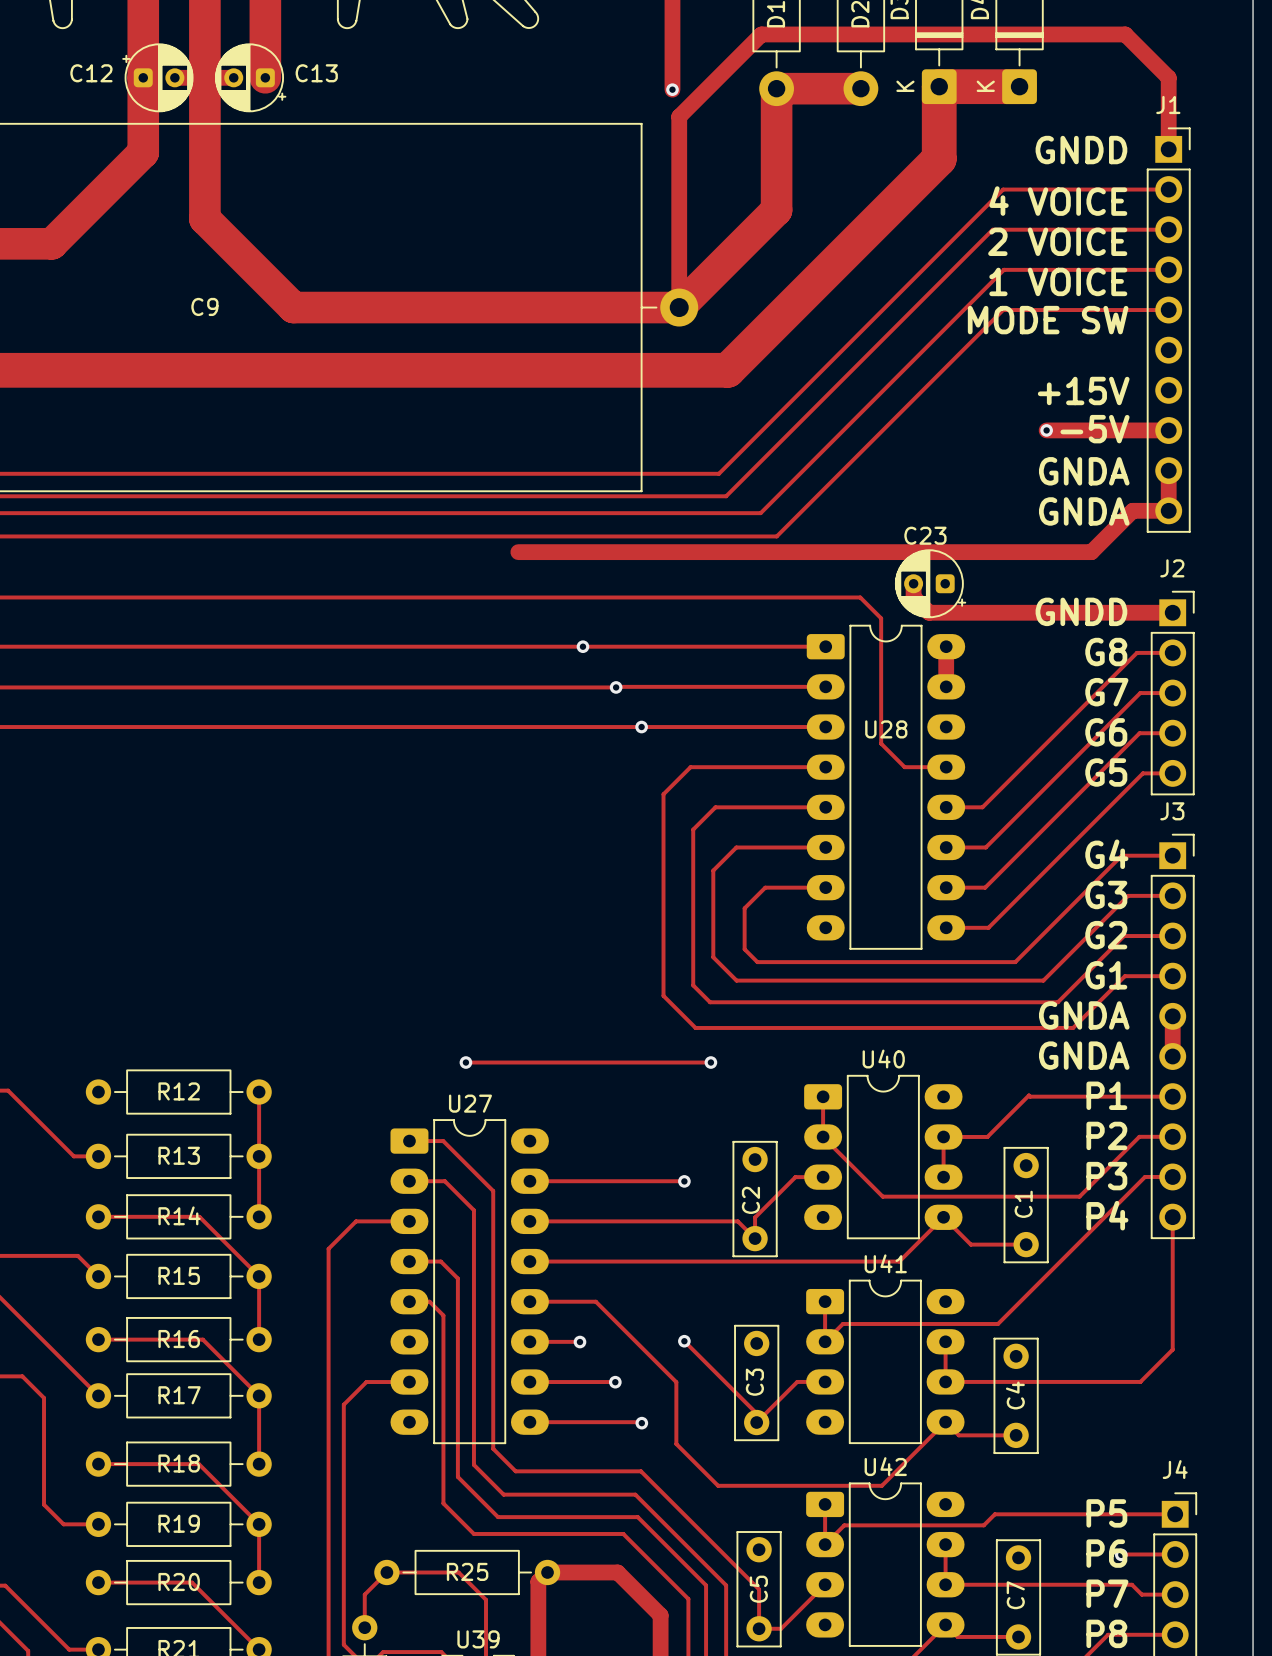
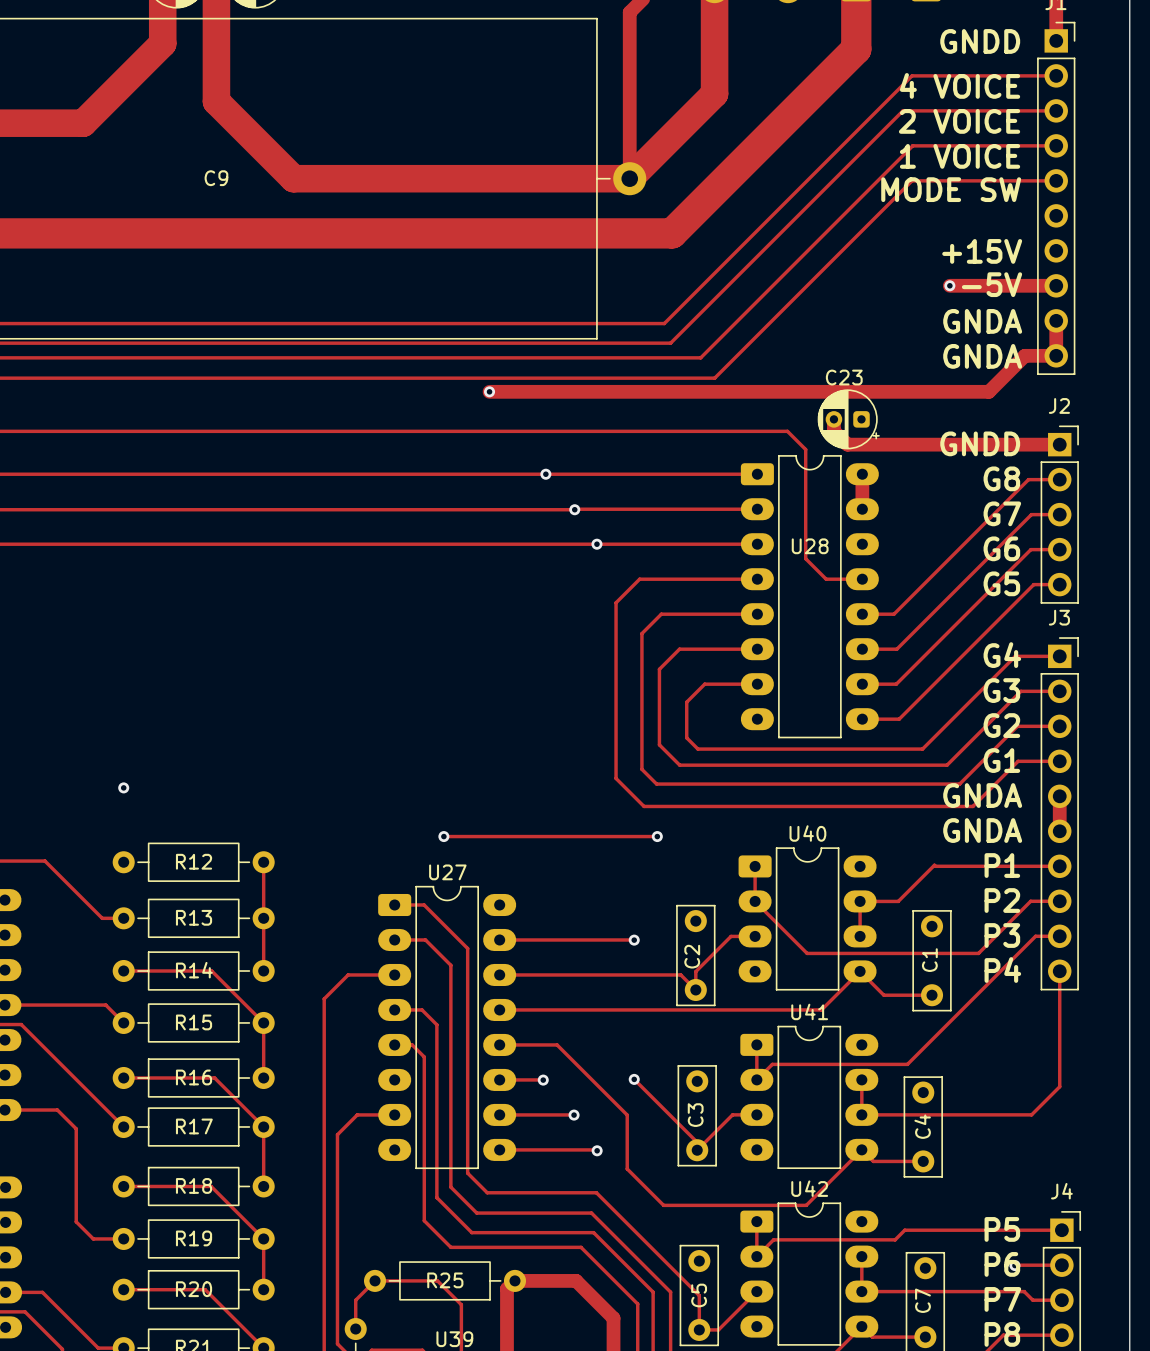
via: none -> (489, 391)
via: none -> (123, 787)

